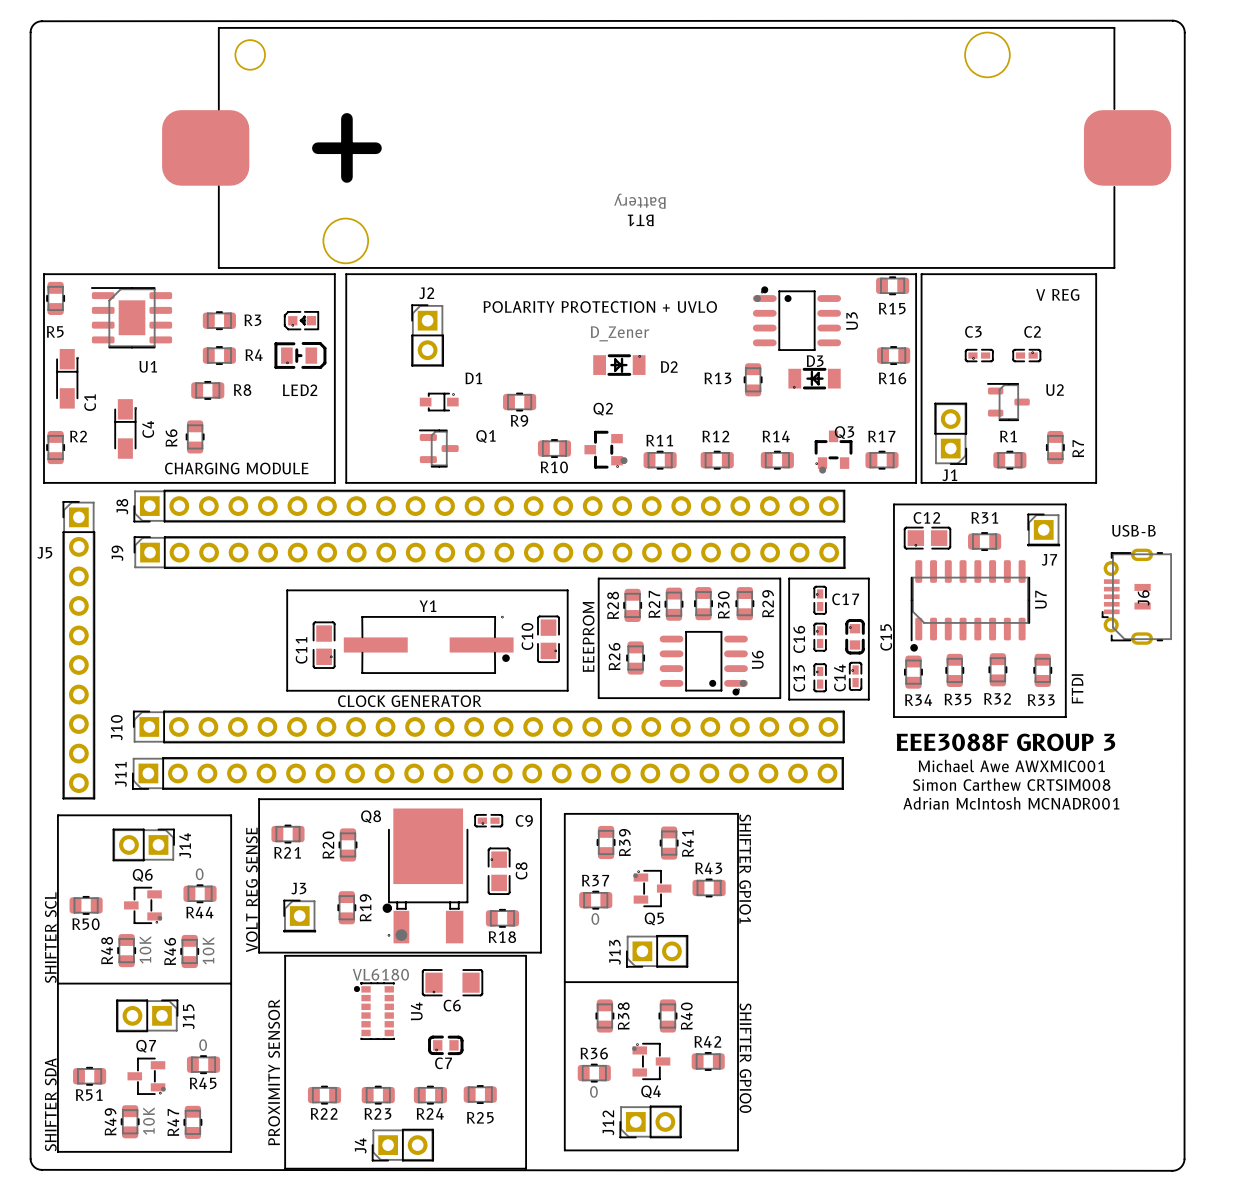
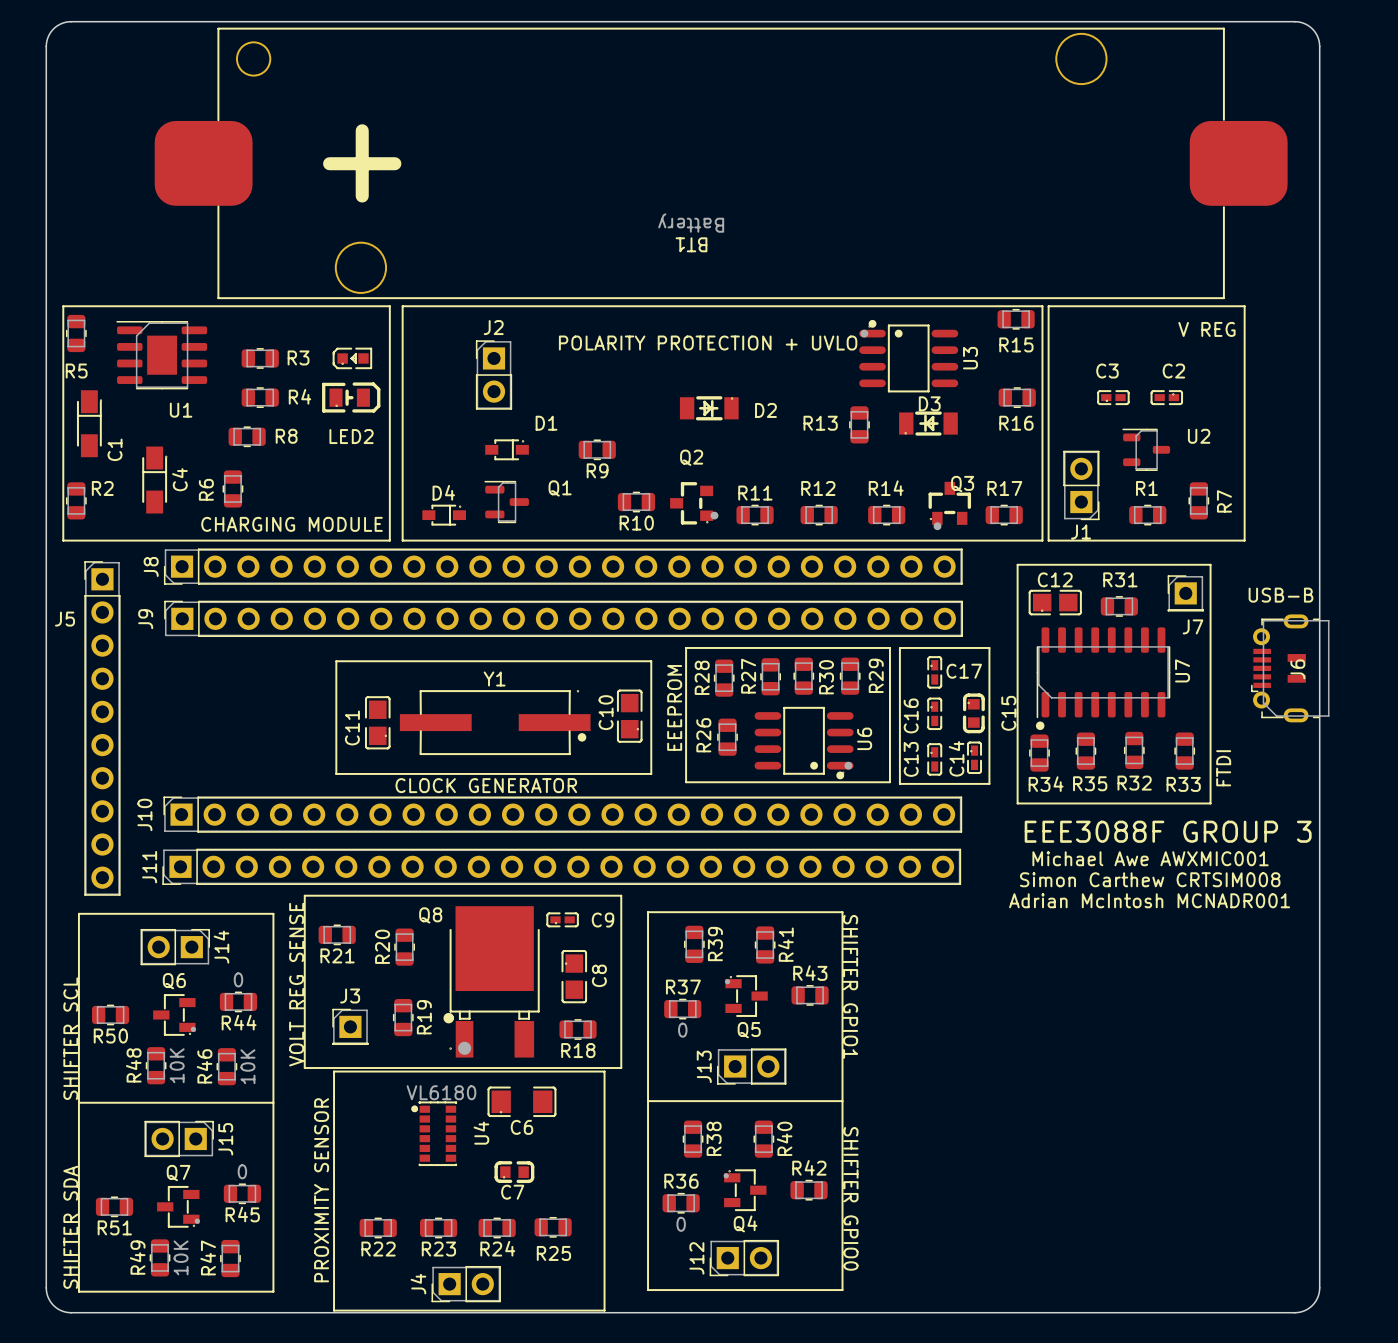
board edge: (1172, 20) (41, 21) (33, 24) (30, 32) (30, 1158) (33, 1166) (41, 1169) (1172, 1170) (1180, 1167) (1184, 1159) (1184, 32) (1181, 24) (1172, 20) -> (71, 21) (62, 23) (53, 28) (47, 38) (46, 46) (46, 1287) (48, 1298) (53, 1305) (62, 1311) (71, 1312) (1294, 1312) (1303, 1311) (1312, 1305) (1317, 1298) (1319, 1287) (1319, 46) (1317, 35) (1312, 28) (1303, 23) (1294, 21) (71, 21)
BT1 position: (666, 147) -> (721, 163)
D2 value: D_Zener (620, 333) -> none
D4: none -> (444, 515)
text position: USB-B (1133, 530) -> USB-B (1280, 595)

